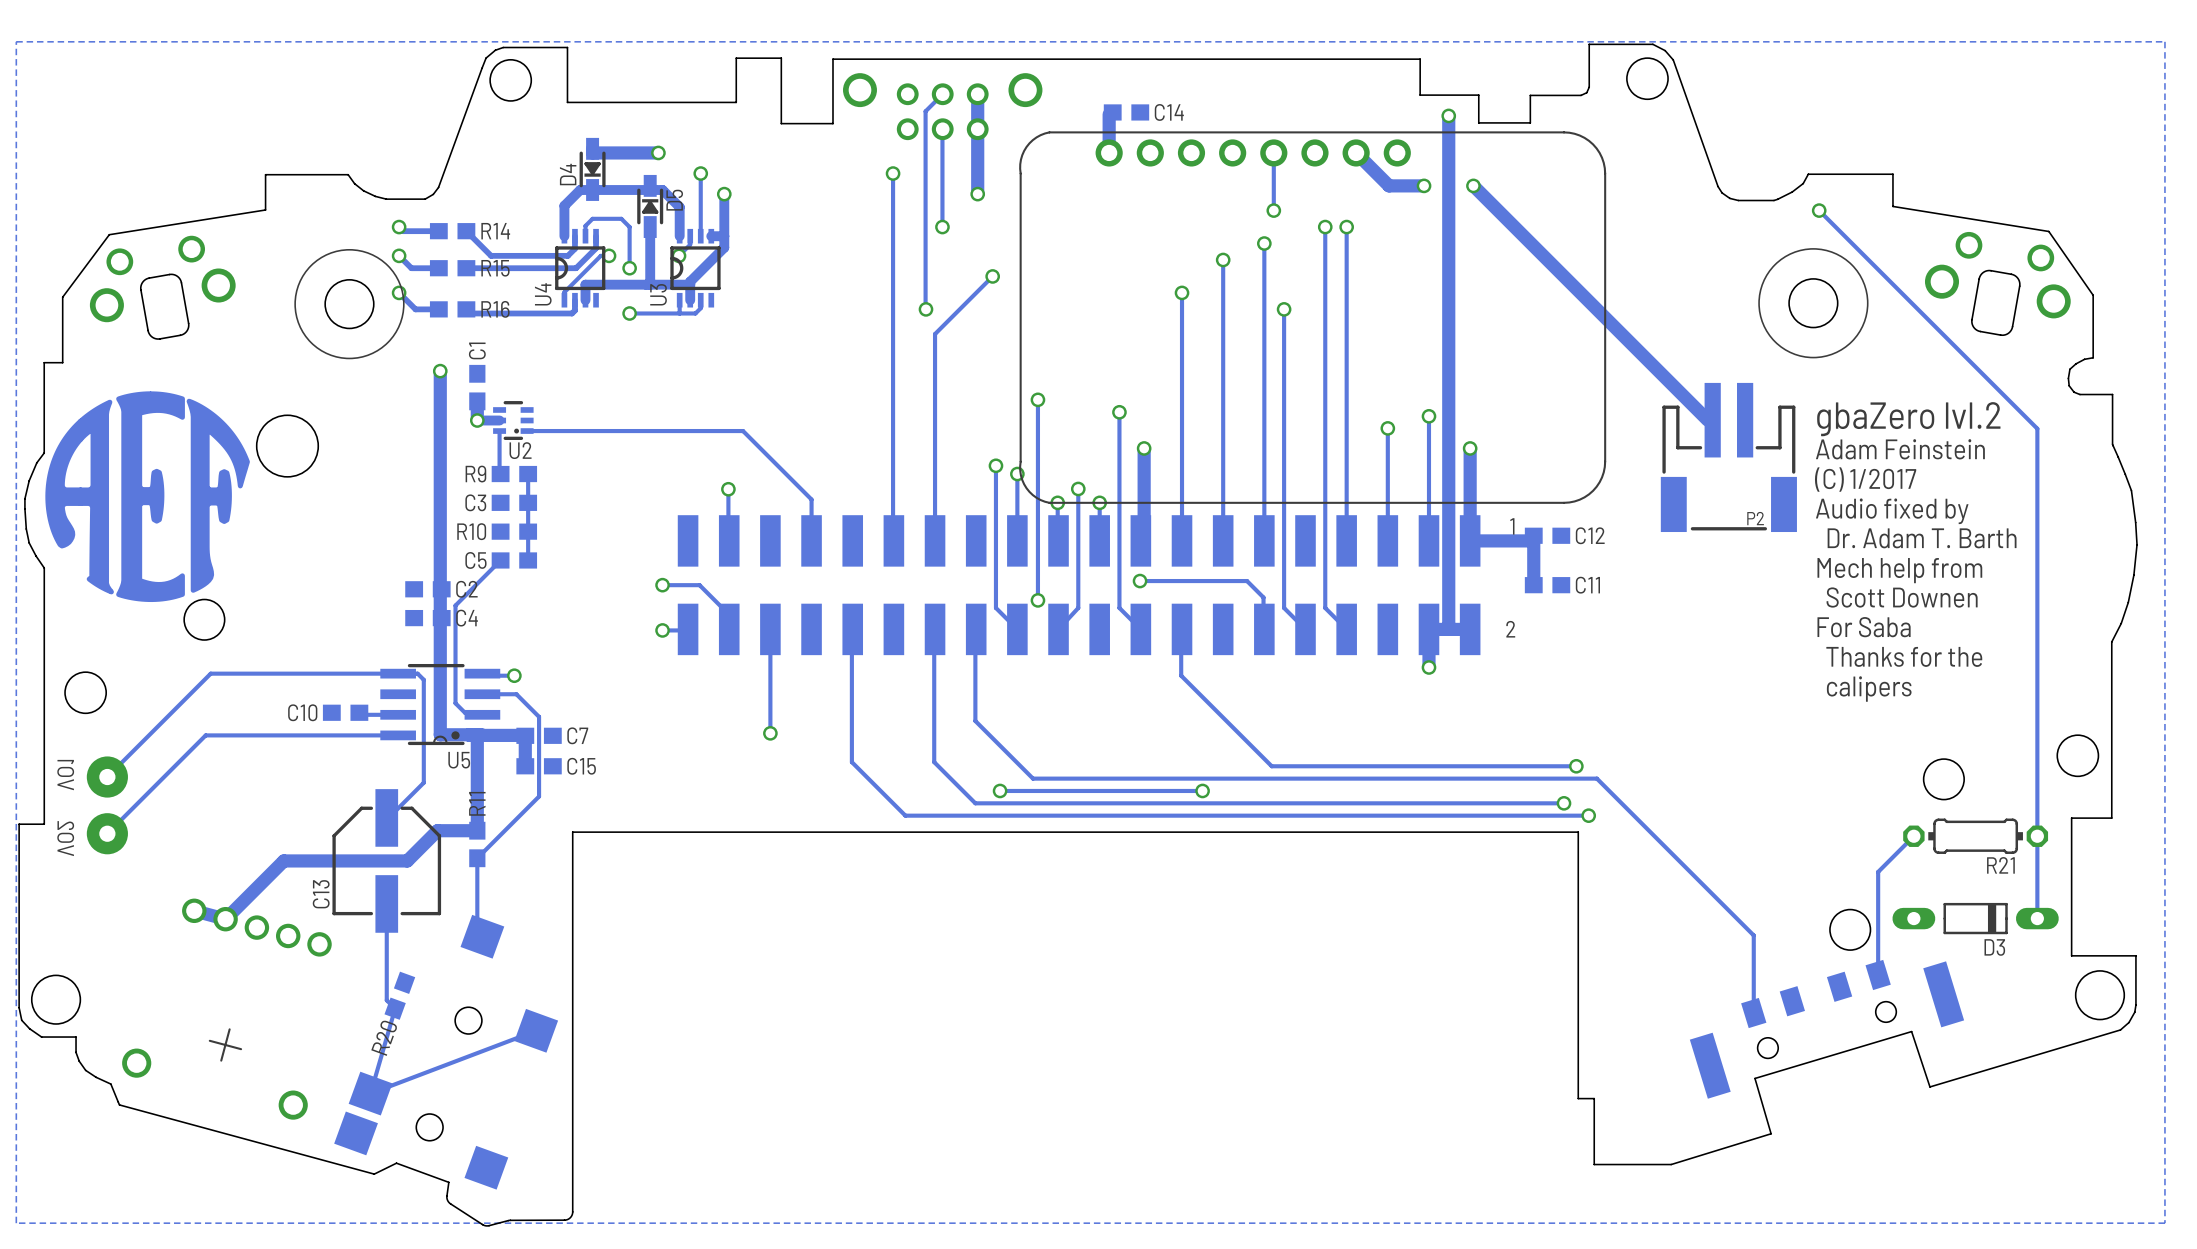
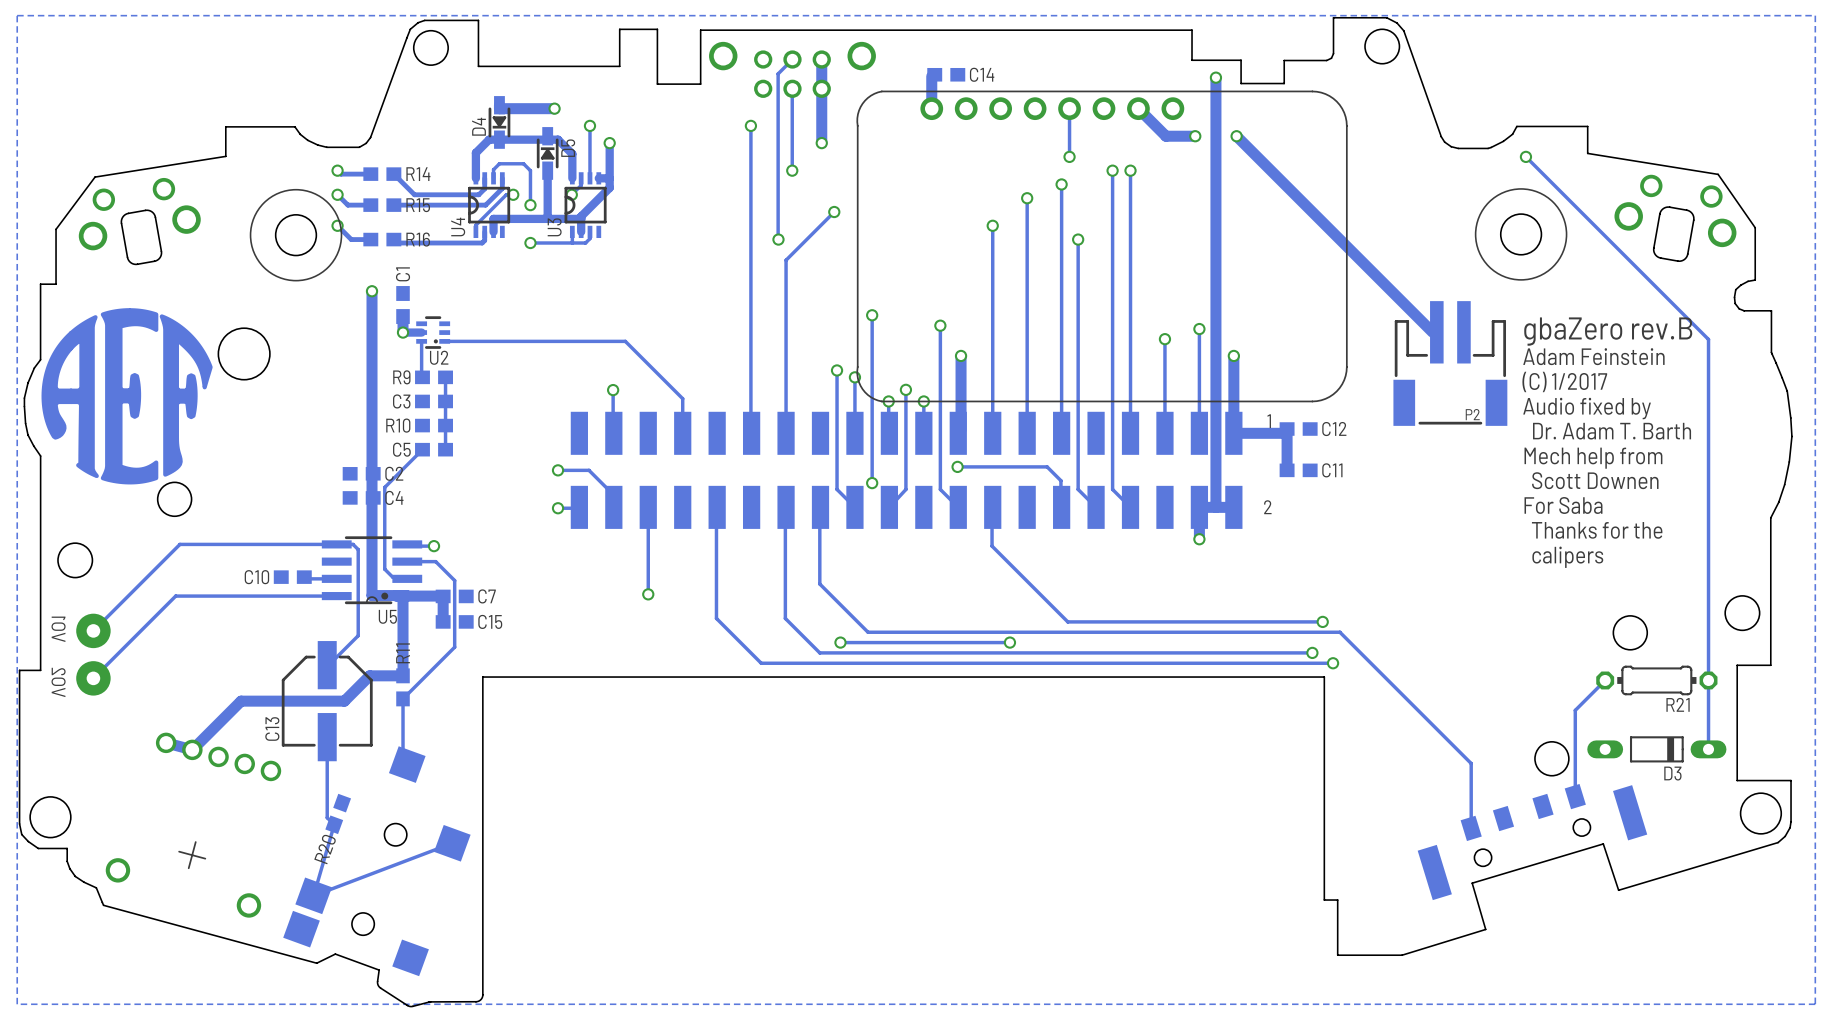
text: gbaZero lvl.2 (1908, 419) -> gbaZero rev.B (1608, 331)

